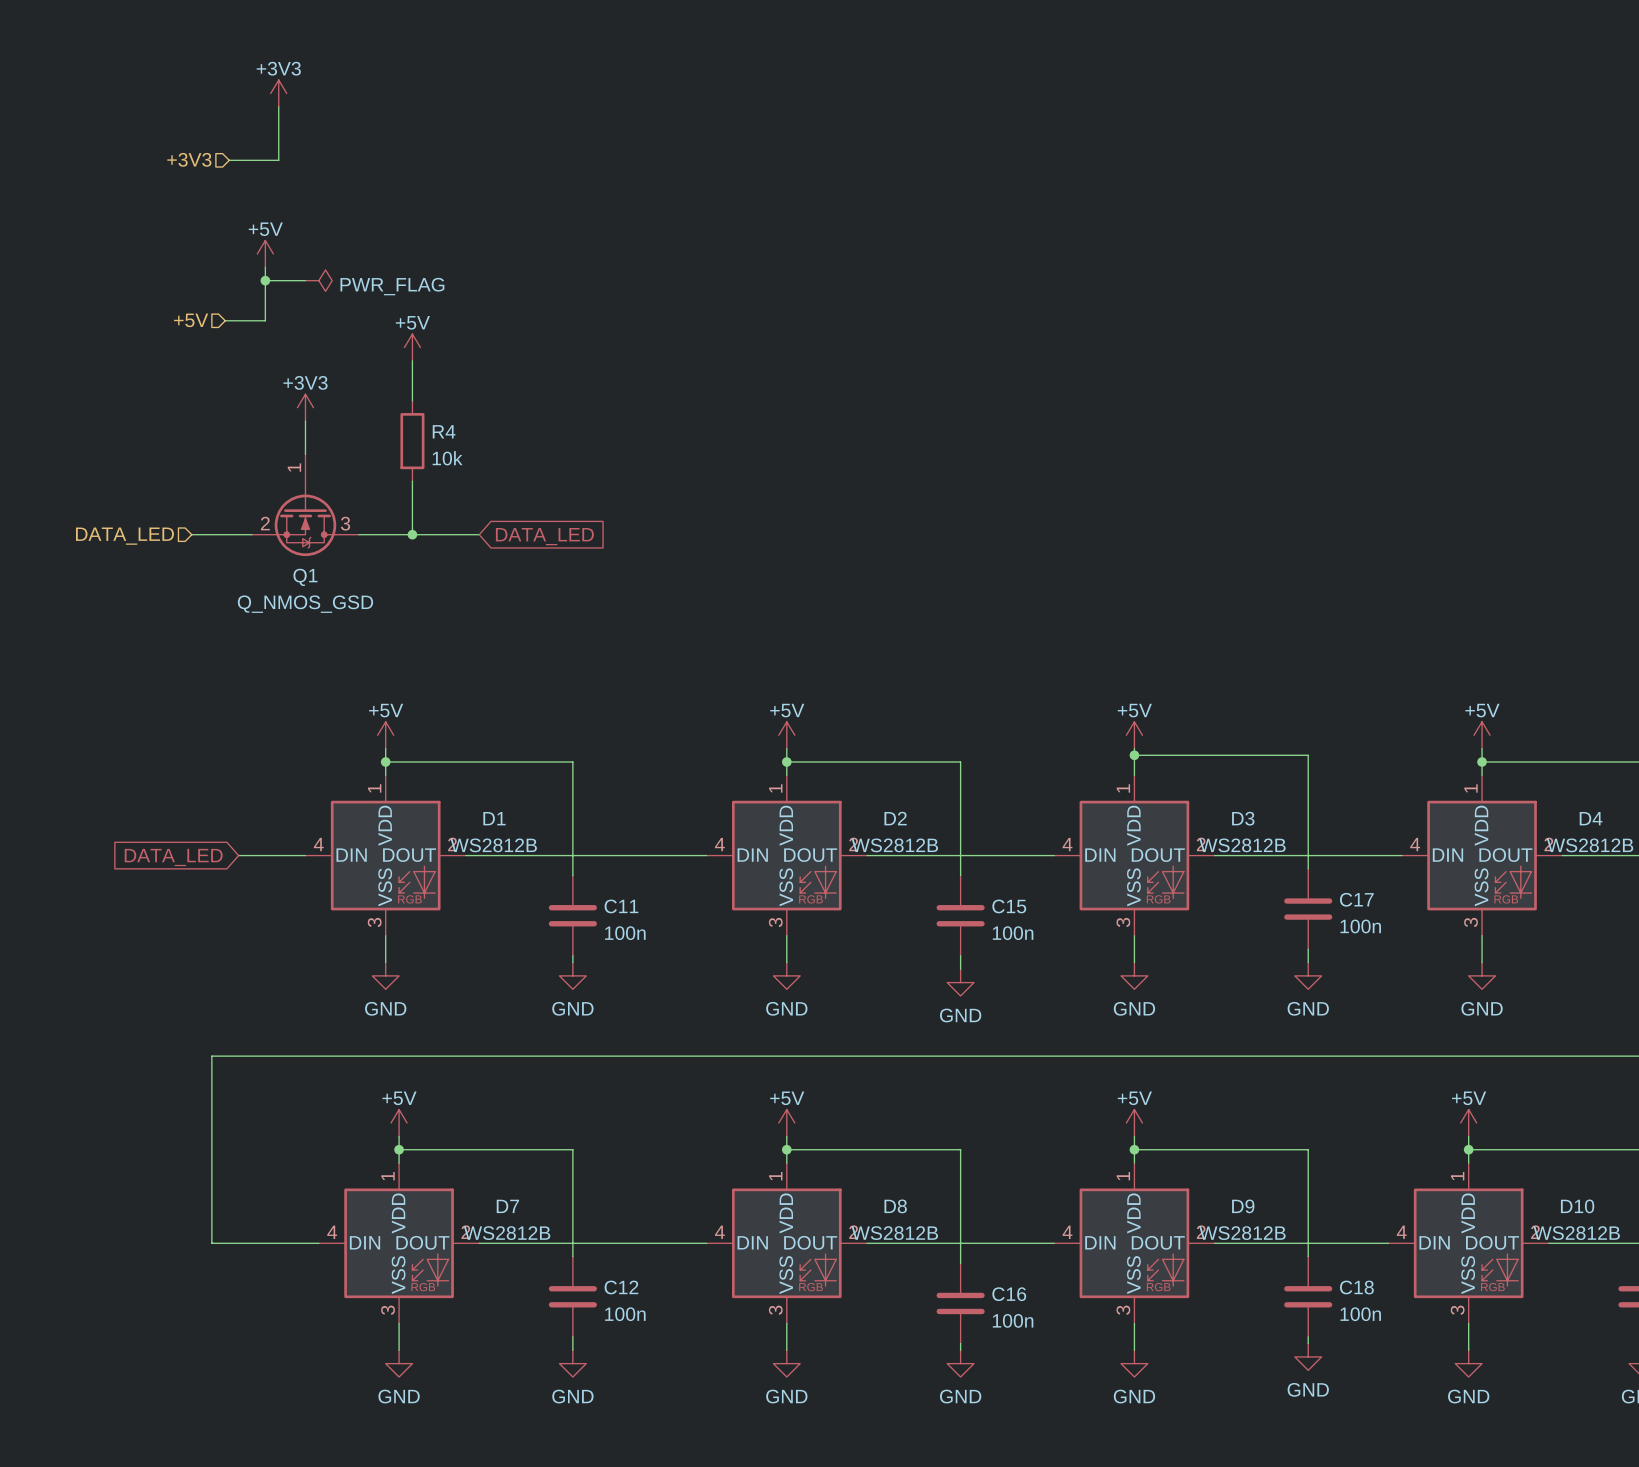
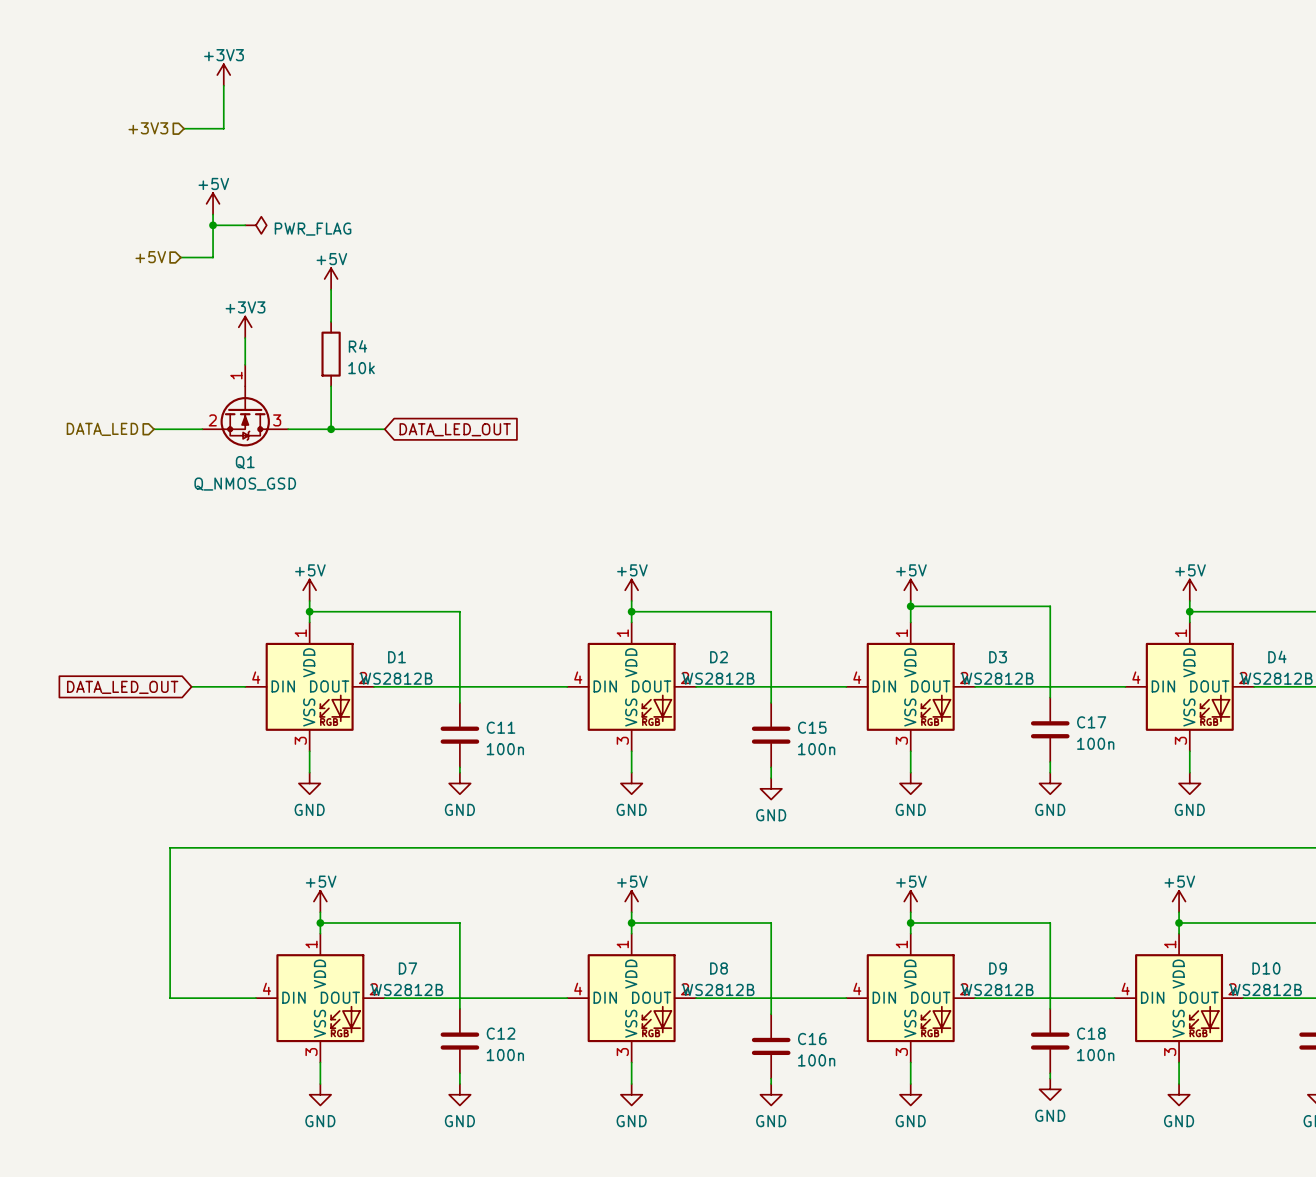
global label: DATA_LED (544, 536) -> DATA_LED_OUT (455, 429)
global label: DATA_LED (173, 857) -> DATA_LED_OUT (122, 687)

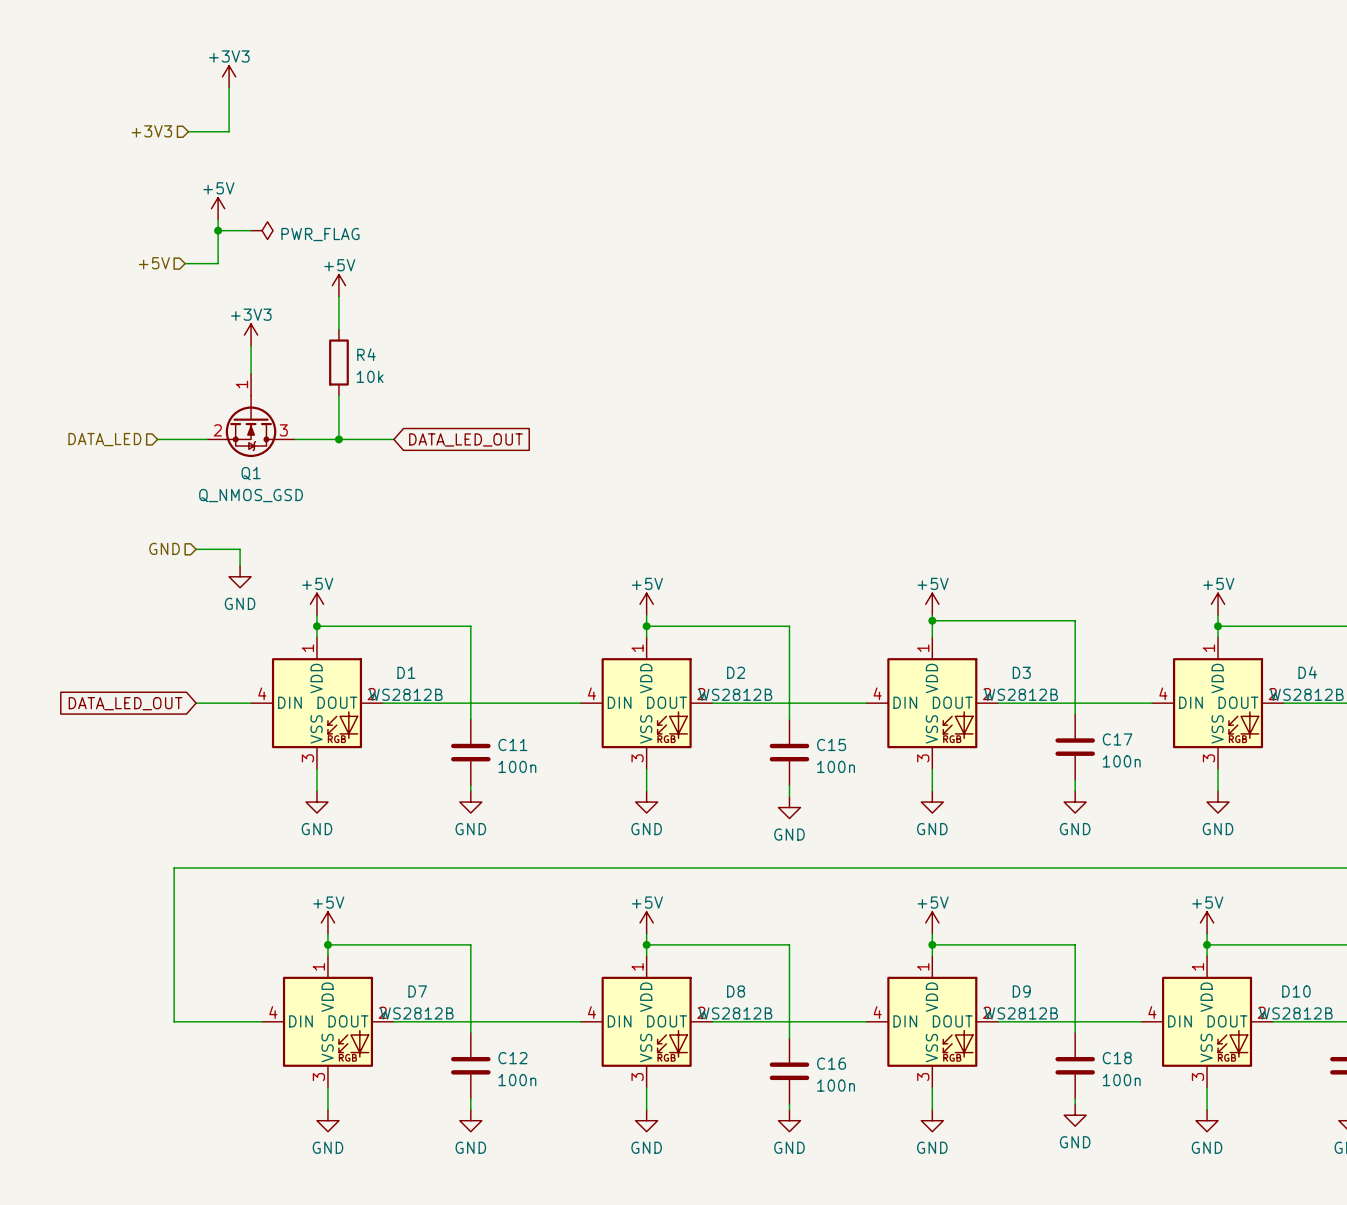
hierarchical label: none -> GND (164, 548)
wire: none -> (196, 549) (240, 549) (240, 565)
power symbol: none -> GND (240, 576)

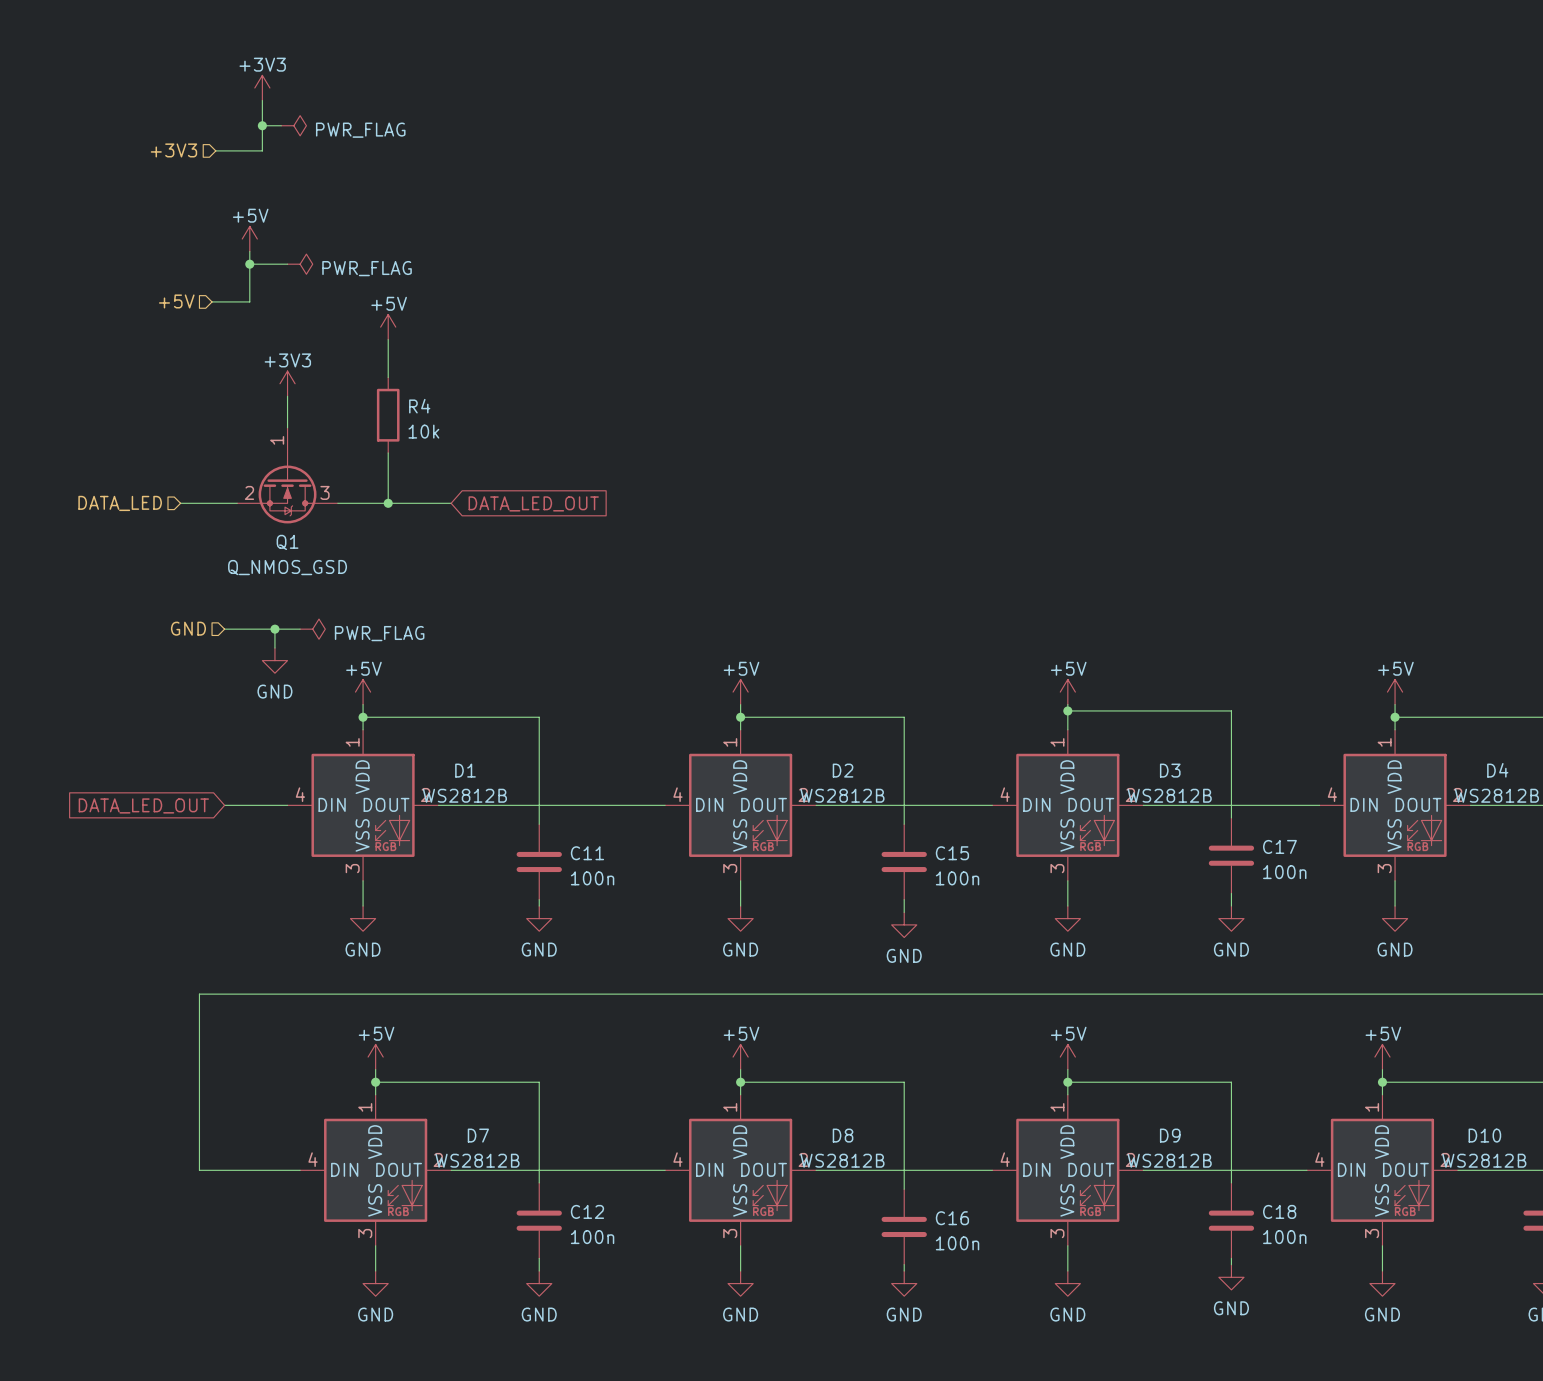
wire: none -> (262, 125) (281, 125)
junction: none -> (262, 125)
power symbol: none -> PWR_FLAG (293, 125)
wire: none -> (274, 629) (300, 629)
junction: none -> (274, 629)
power symbol: none -> PWR_FLAG (312, 629)

